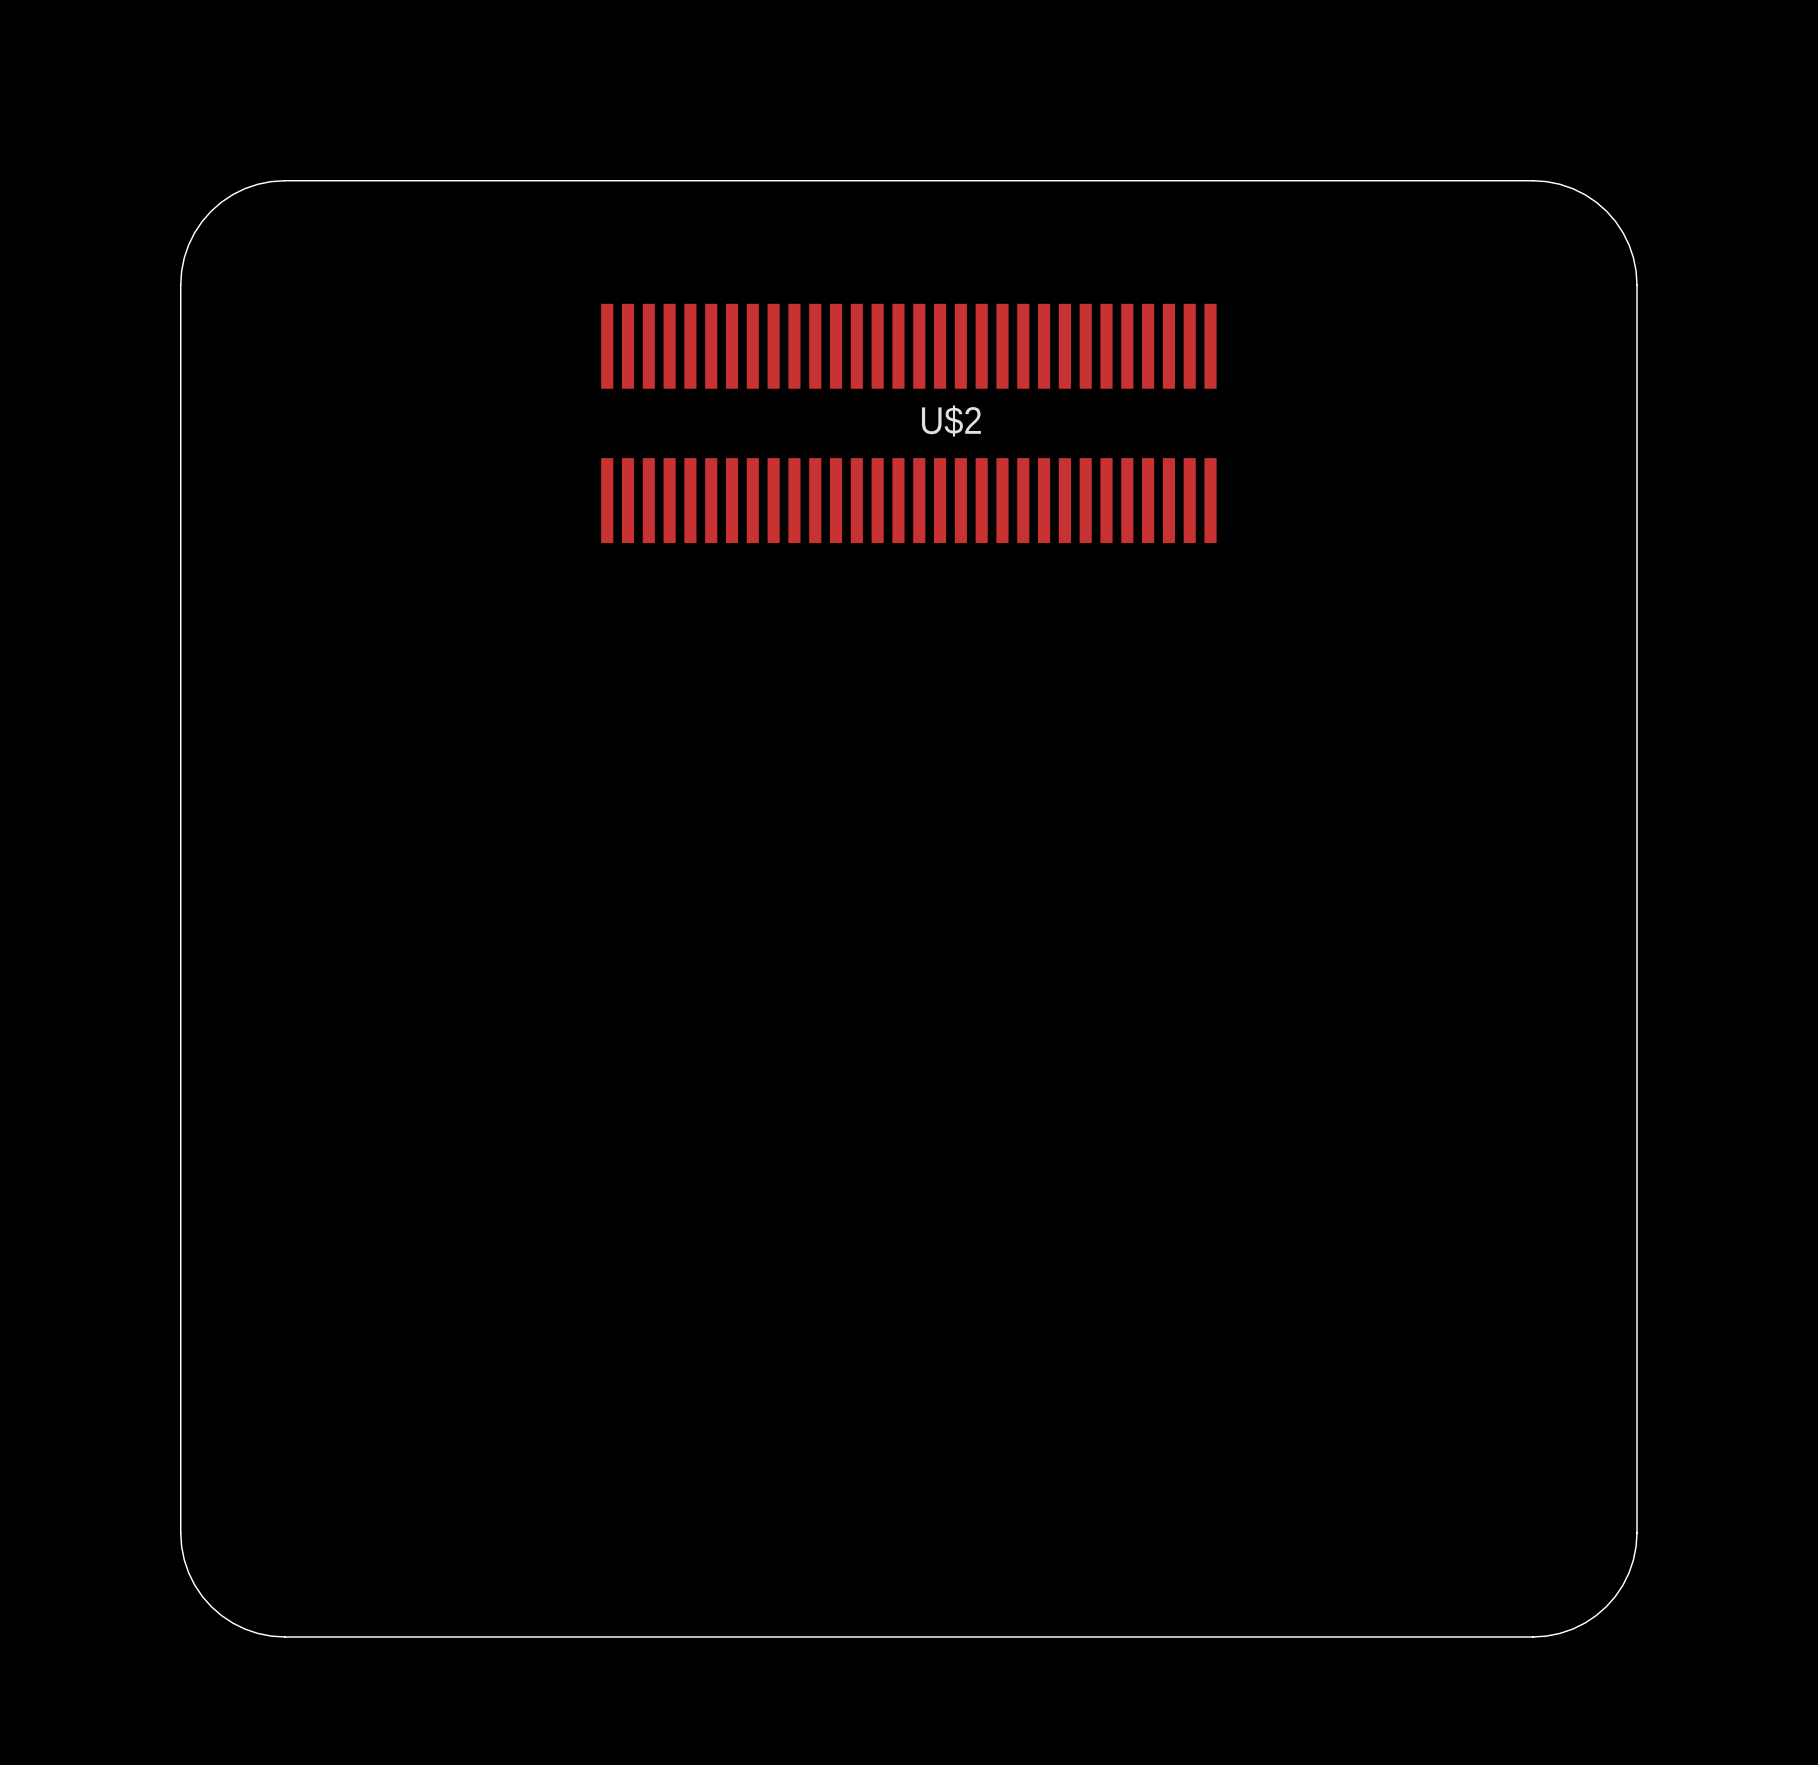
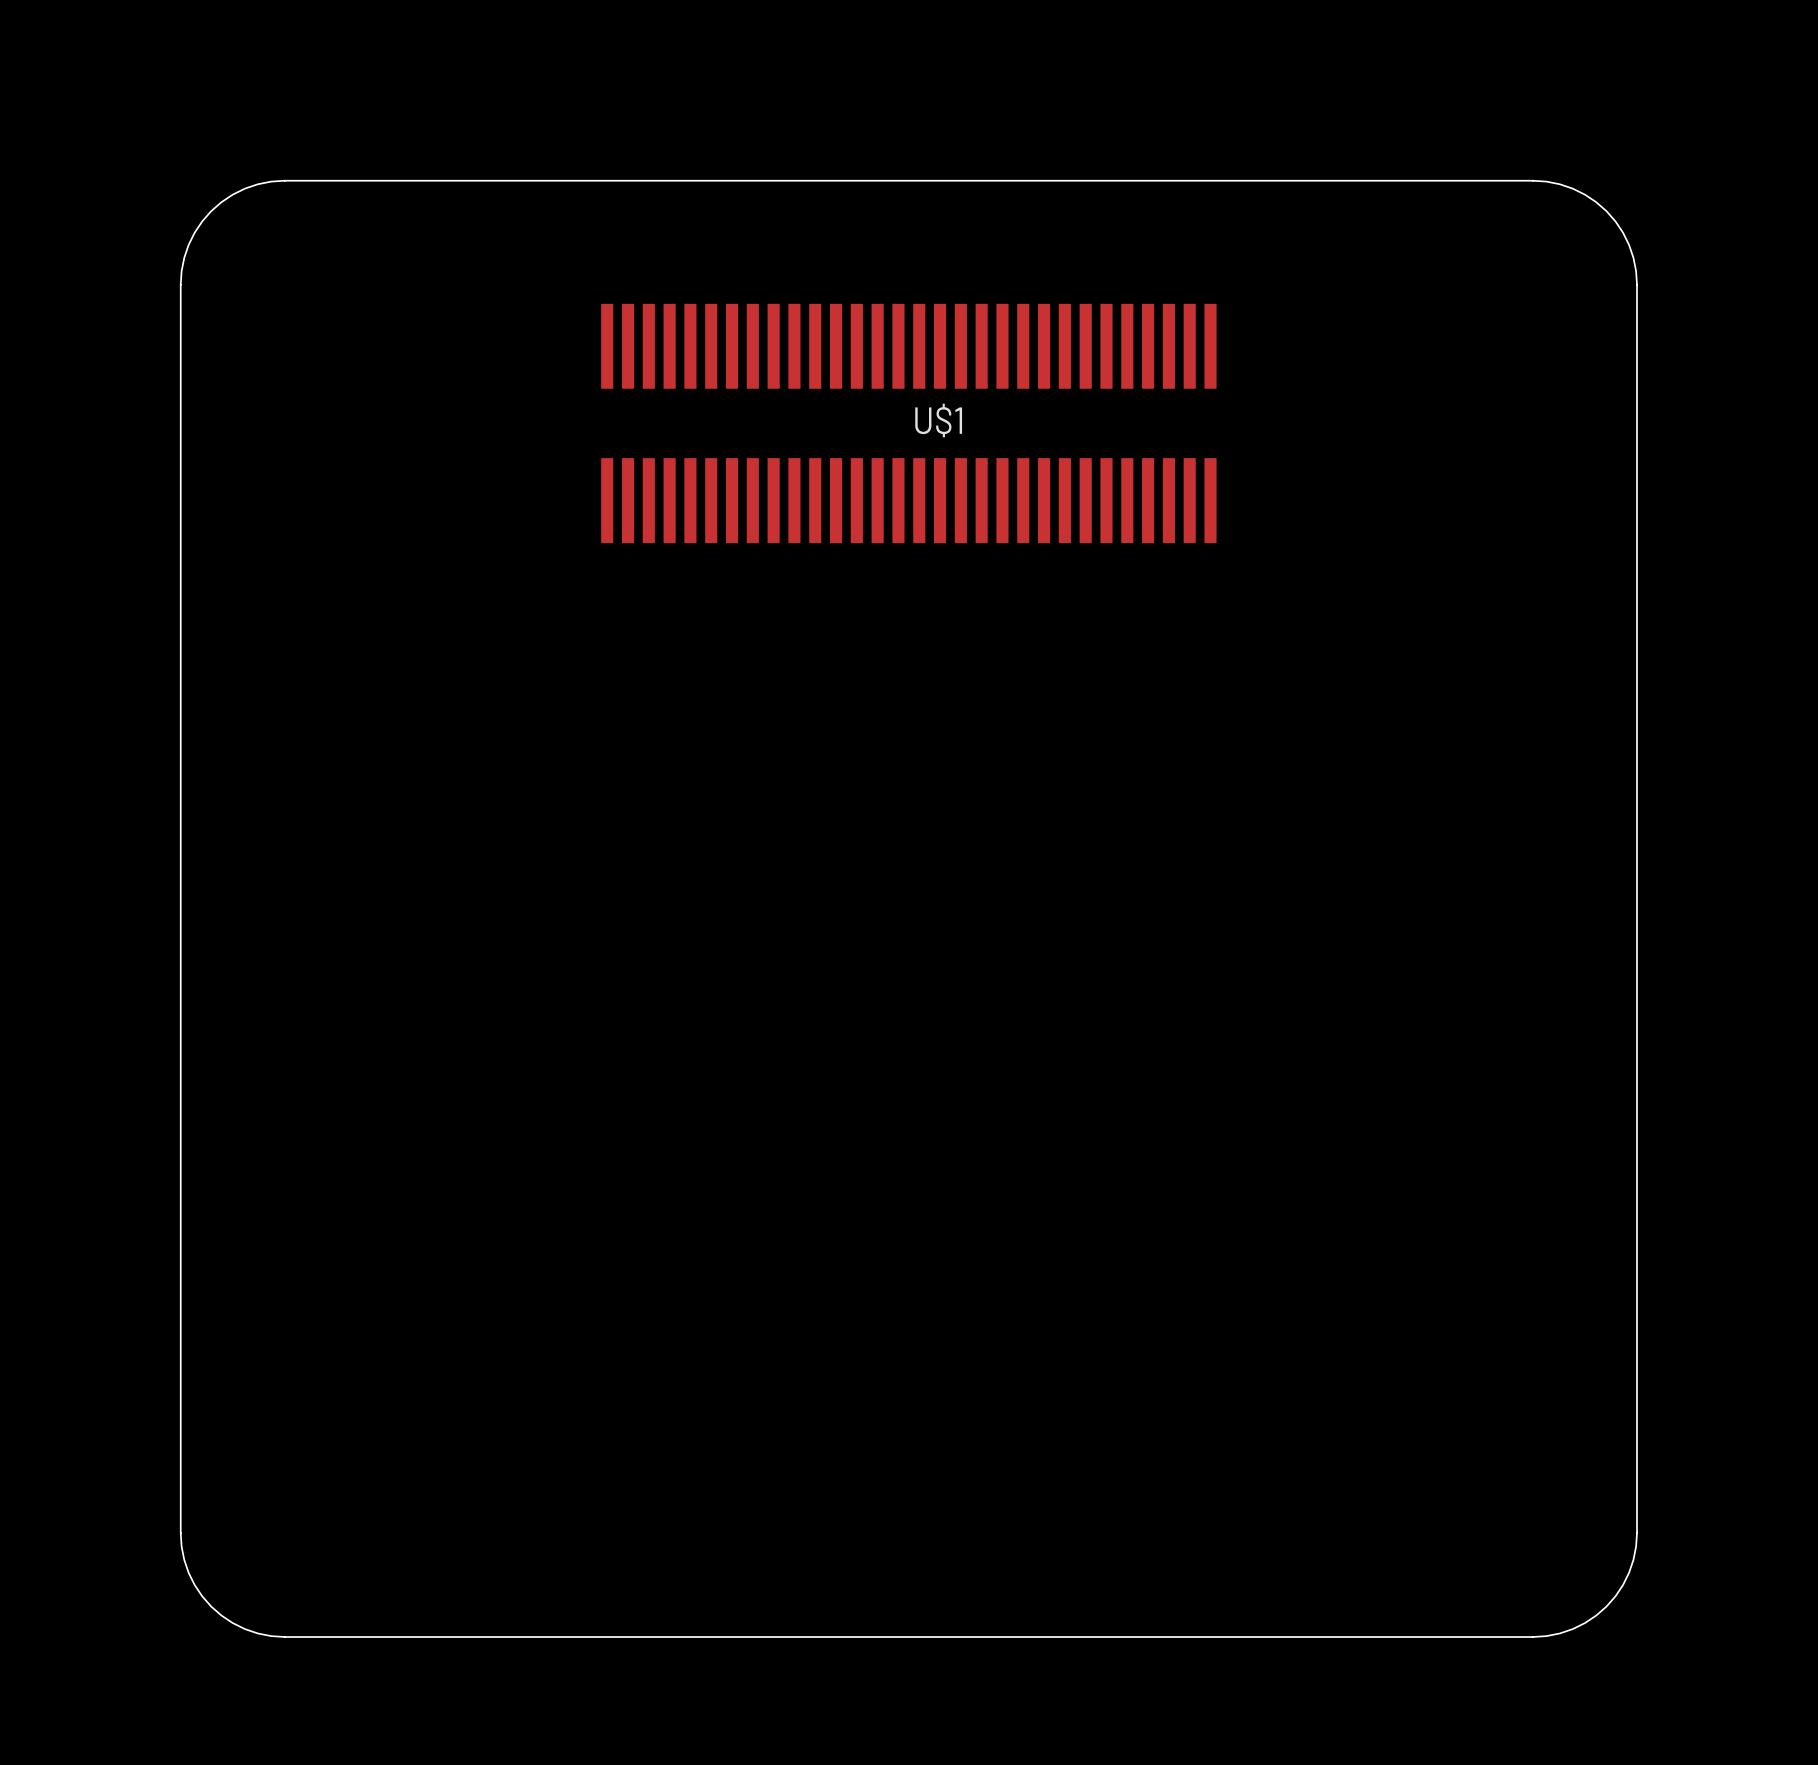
U$2 name: U$2 (951, 420) -> U$1 (938, 420)

